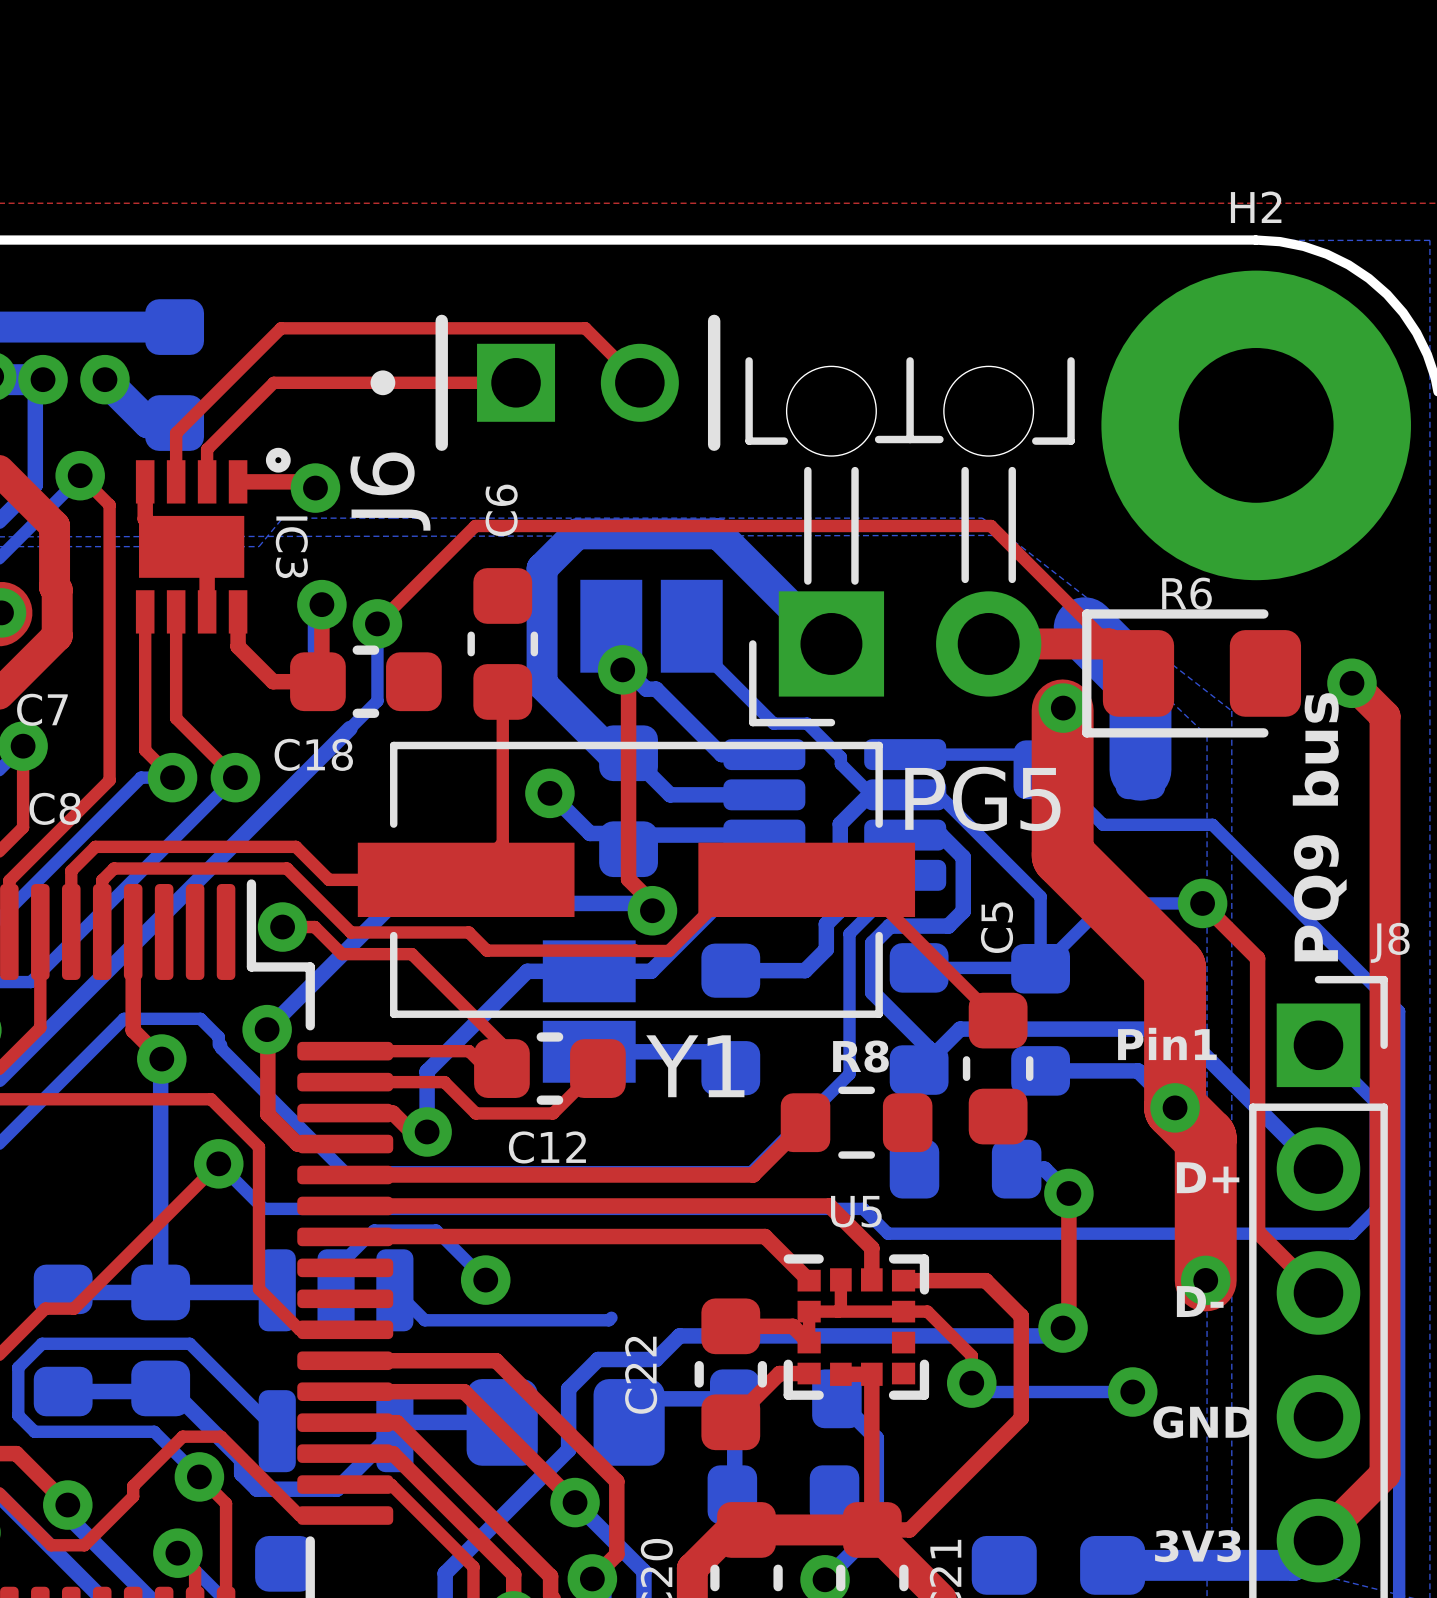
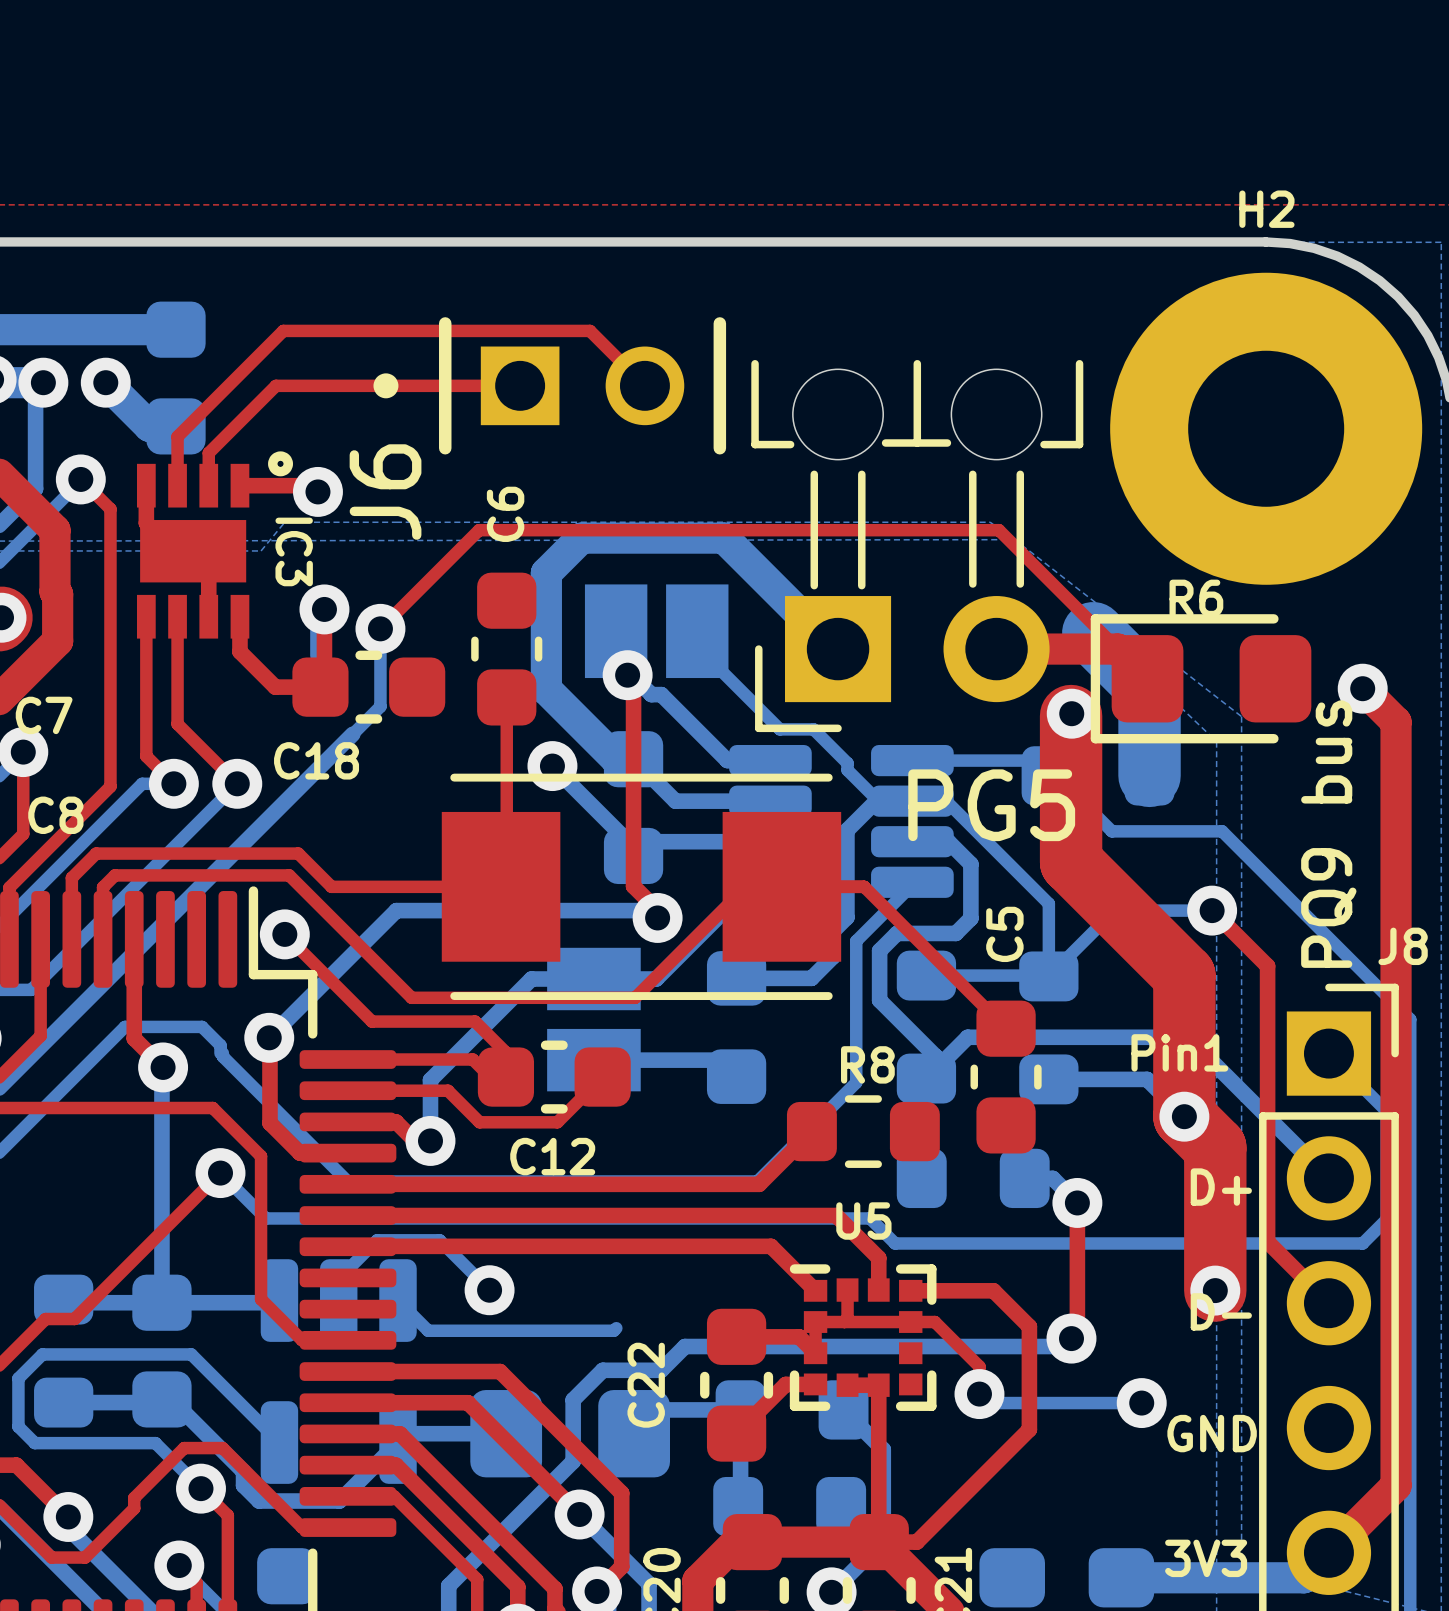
bottom track: (549, 793) (590, 833) (621, 833) -> (552, 766) (626, 840)
via position: (549, 793) -> (552, 766)
Y1: (636, 879) -> none
part: none -> (641, 886)
top track: (282, 927) (314, 927) (341, 954) (411, 954) (471, 1013) -> (284, 934) (372, 1021) (475, 1021)
top track: (350, 932) (468, 932) (487, 950) (635, 950) -> (353, 939) (411, 997) (635, 997) (674, 958)
top track: (635, 950) (669, 950) -> none

